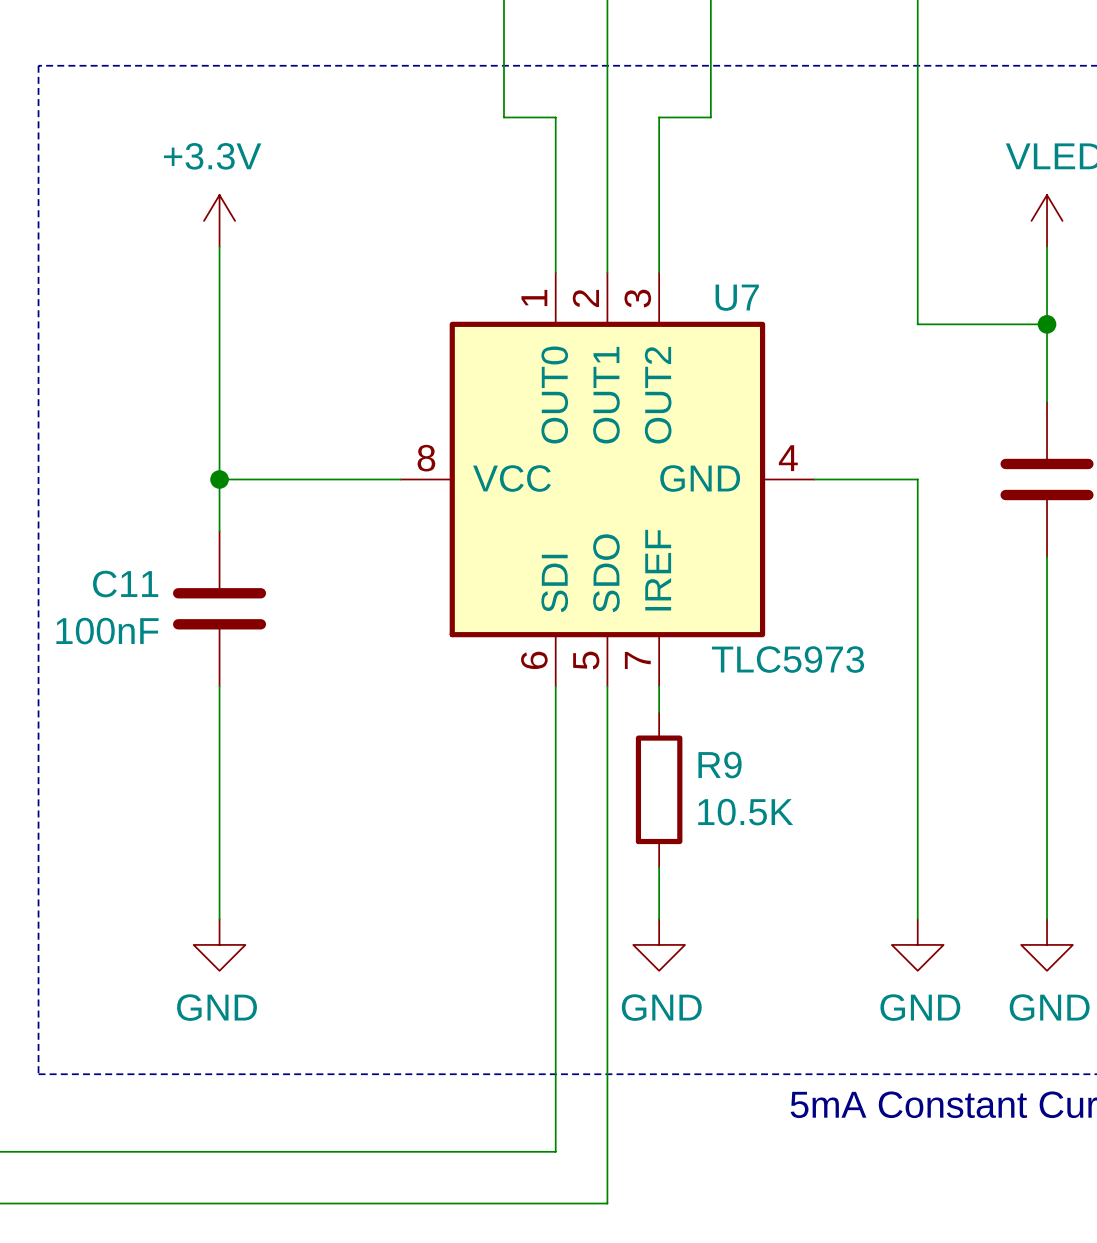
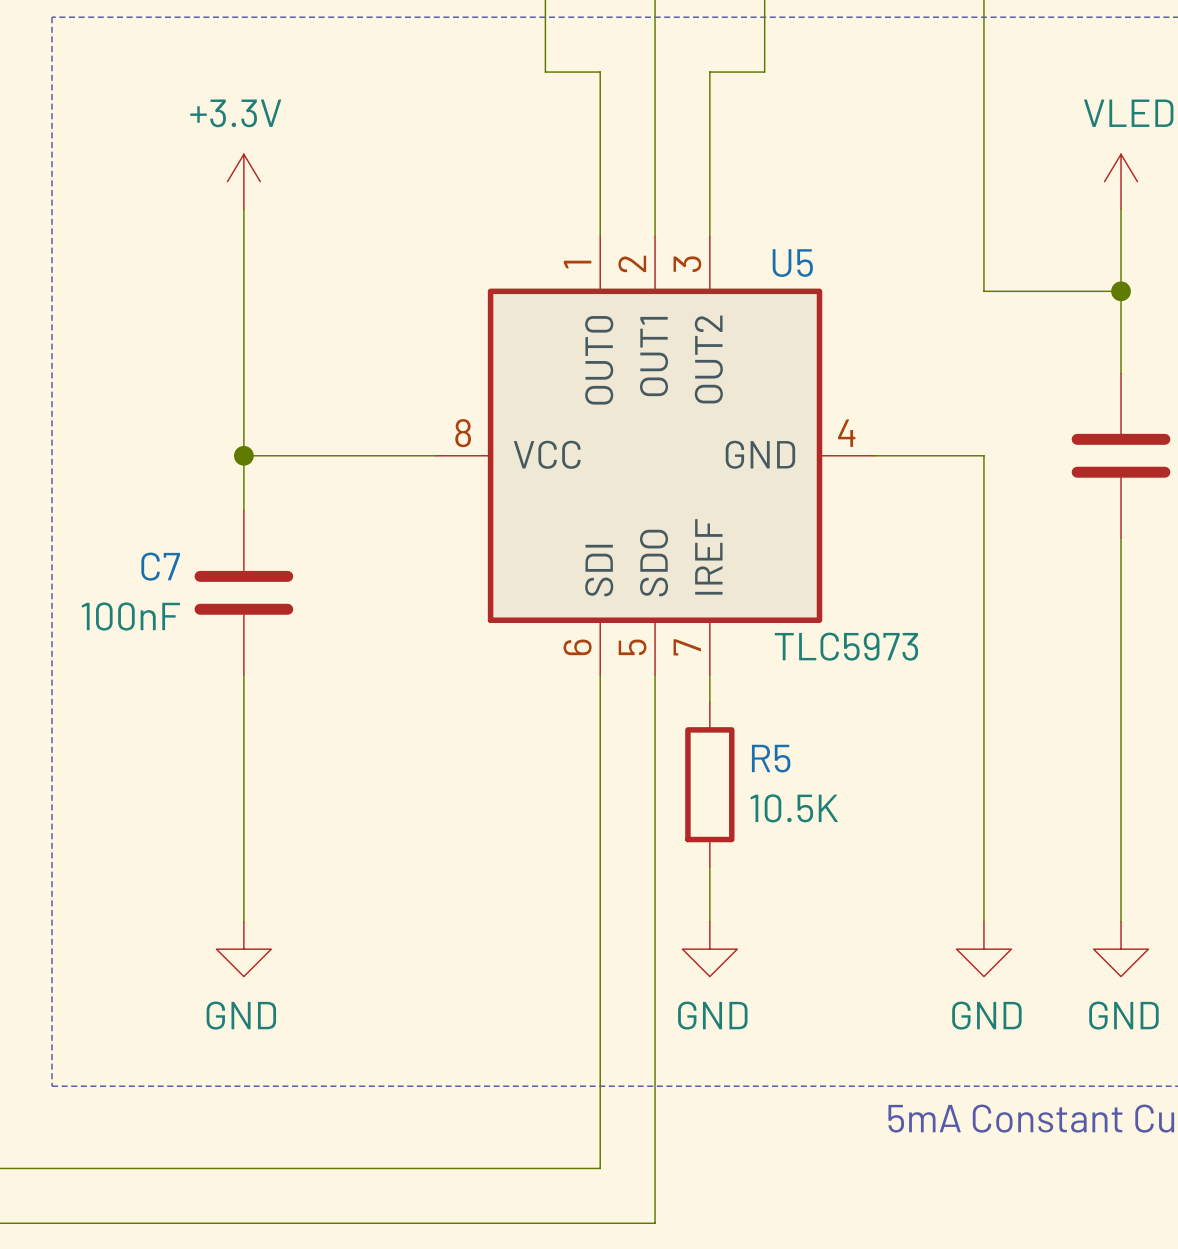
U7 name: U7 (737, 297) -> U5 (792, 263)
C11 name: C11 (125, 584) -> C7 (160, 566)
R9 name: R9 (720, 765) -> R5 (771, 758)

